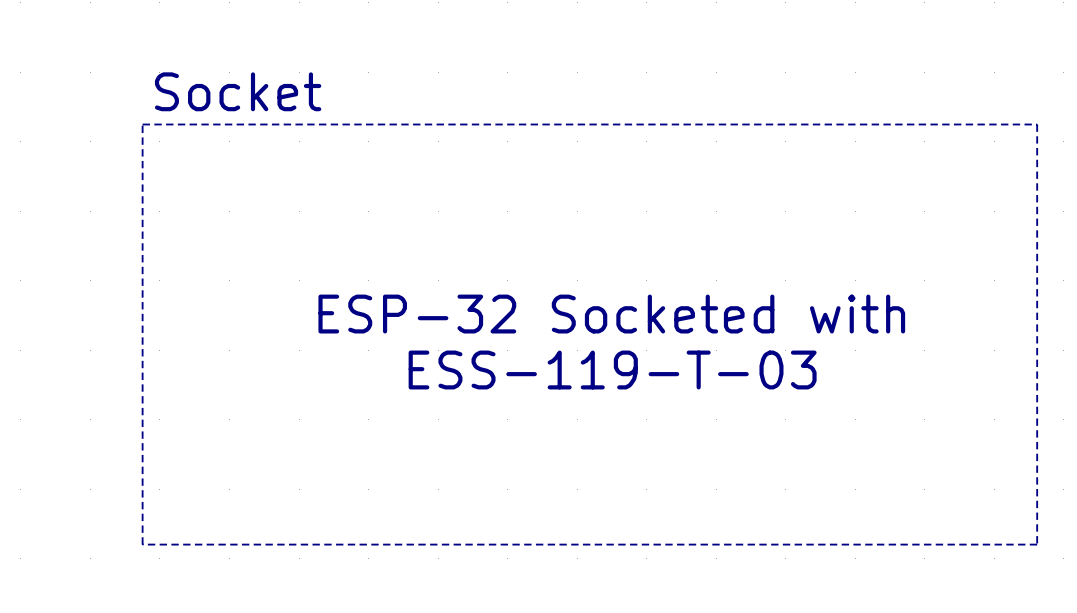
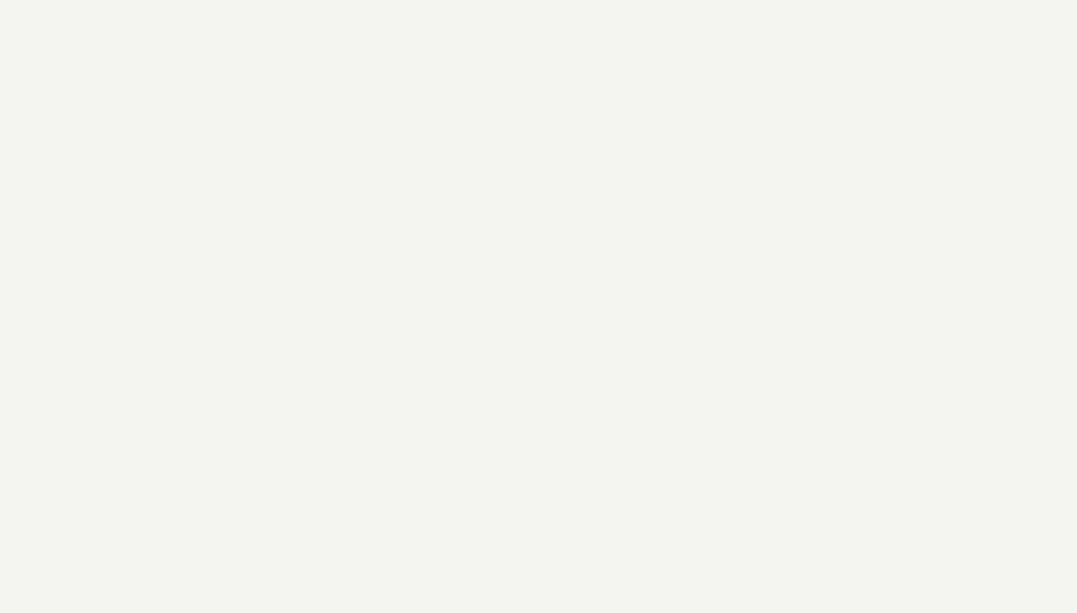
text: Socket (238, 91) -> none
line: (142, 124) (1037, 124) (1037, 544) (142, 544) (142, 124) -> none
text: ESP-32 Socketed with (611, 314) -> none
text: ESS-119-T-03 (612, 369) -> none

